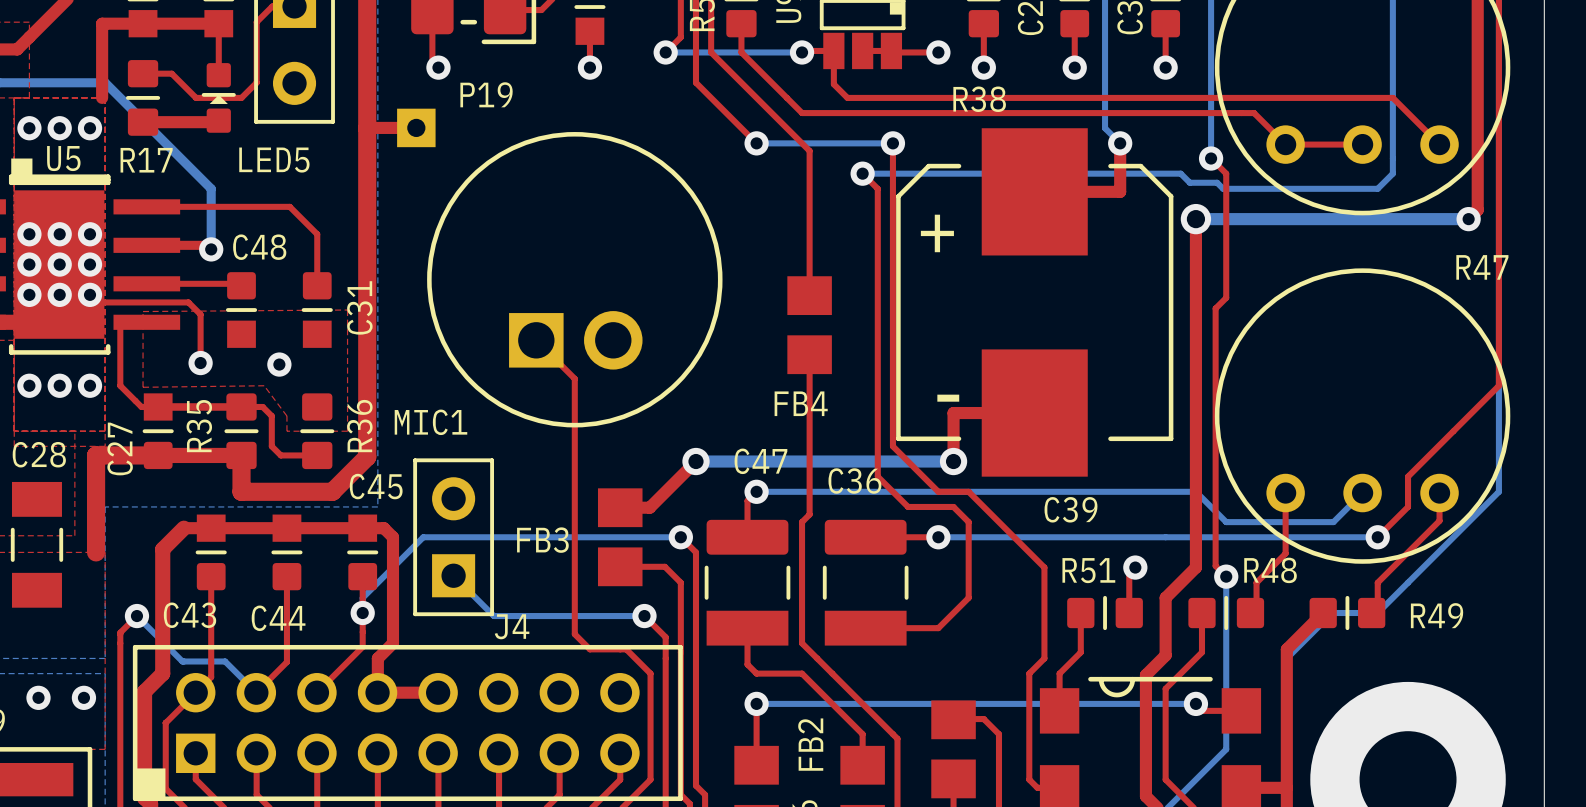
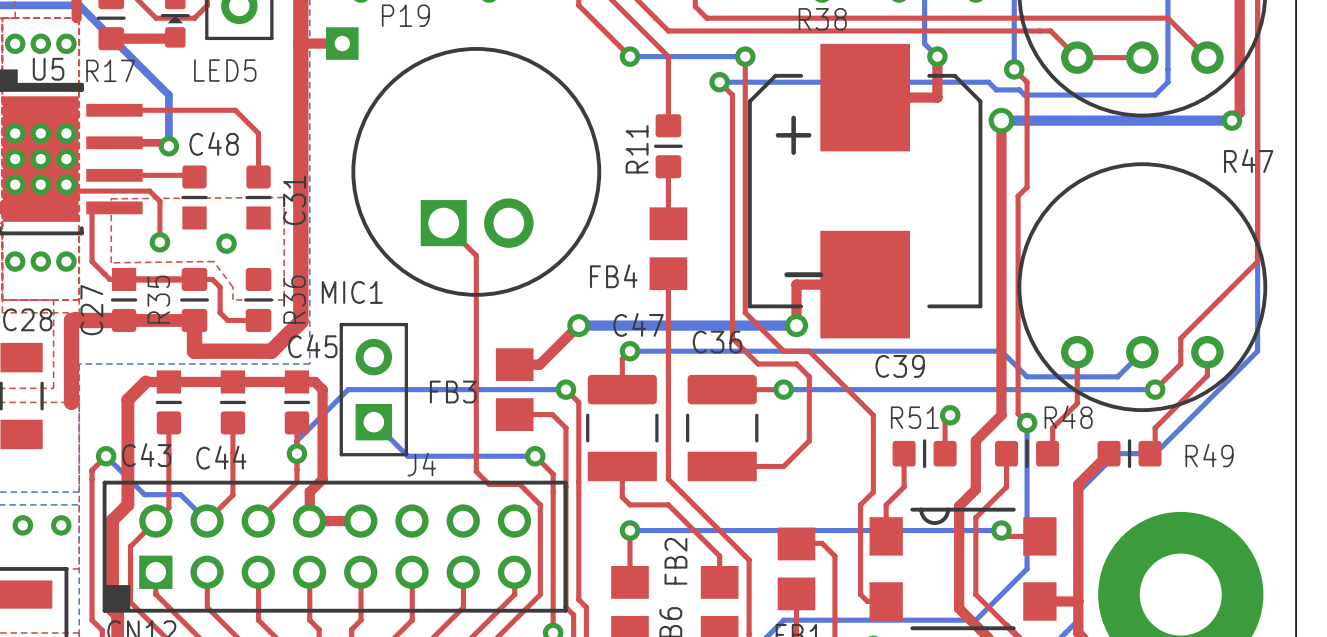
top track: (802, 143) (809, 150) (809, 295) -> (668, 56) (668, 125)
R11: none -> (668, 146)
top track: none -> (668, 166) (668, 223)
FB4 position: (809, 325) -> (668, 248)
top track: (809, 354) (809, 514) (802, 522) -> (668, 273) (668, 376)
FB4 name position: FB4 (801, 403) -> FB4 (613, 276)

